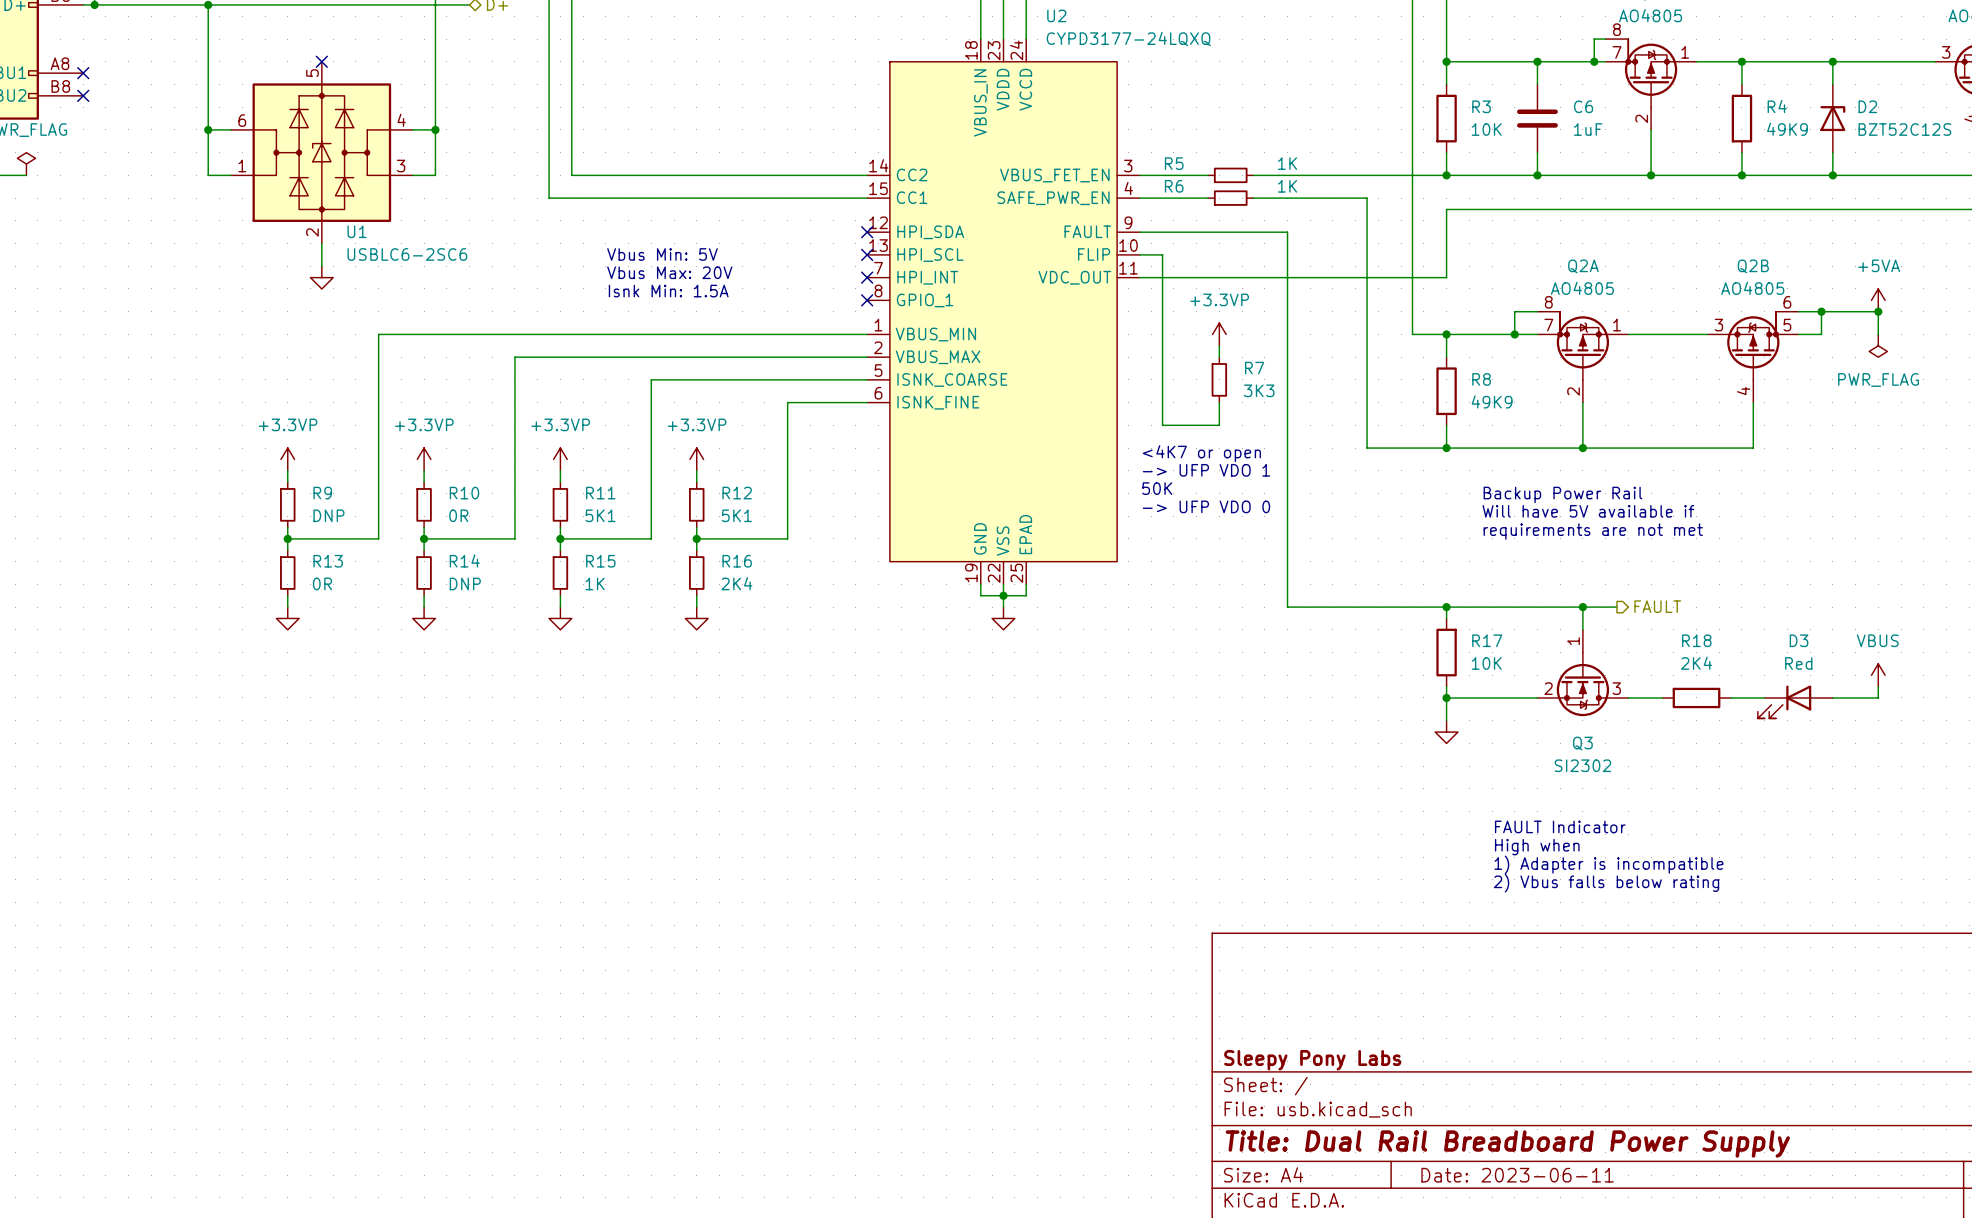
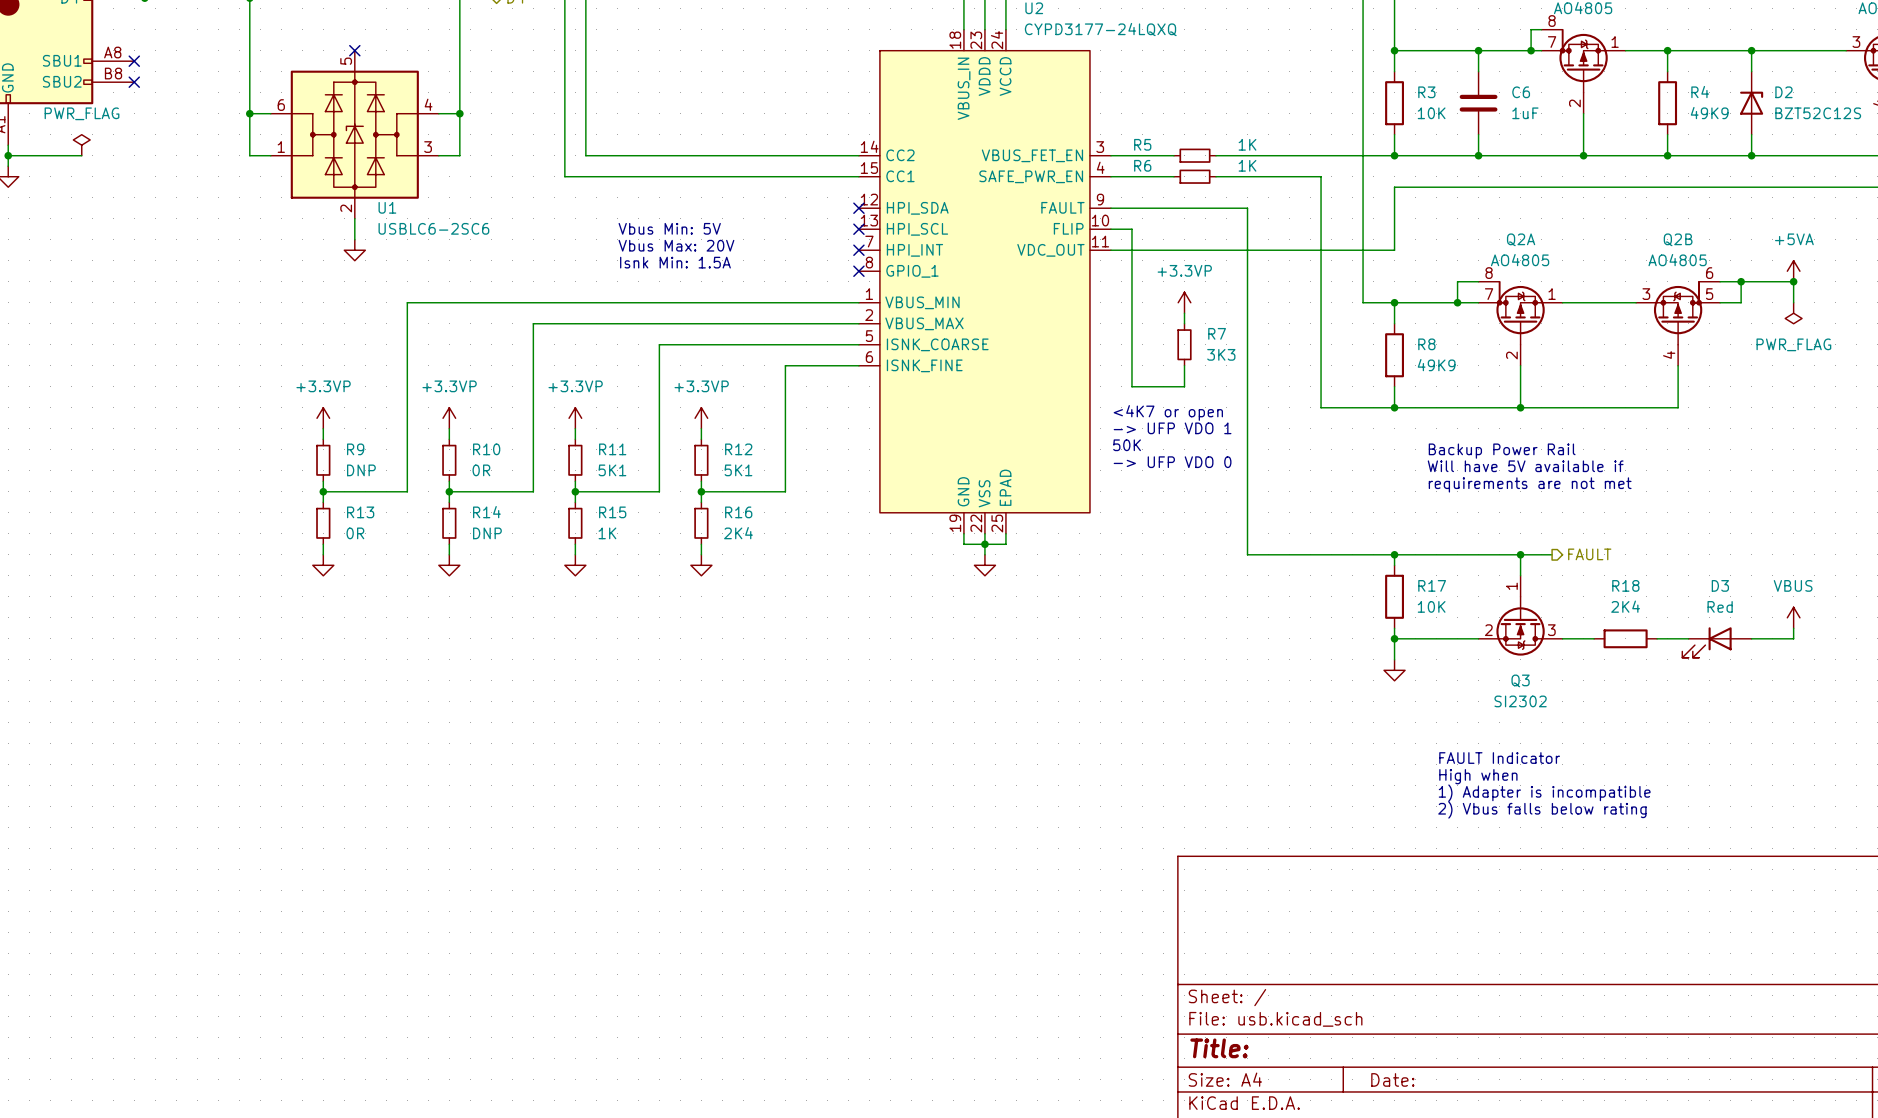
title block: Sleepy Pony Labs (1312, 1060) -> none
title block: Title: Dual Rail Breadboard Power Supply (1507, 1144) -> Title: (1219, 1048)
title block: Date: 2023-06-11 (1517, 1175) -> Date: (1392, 1079)

